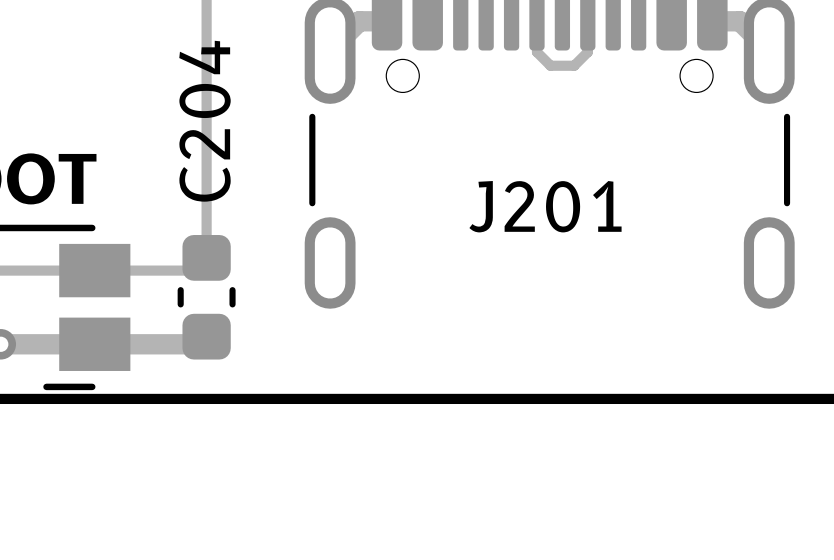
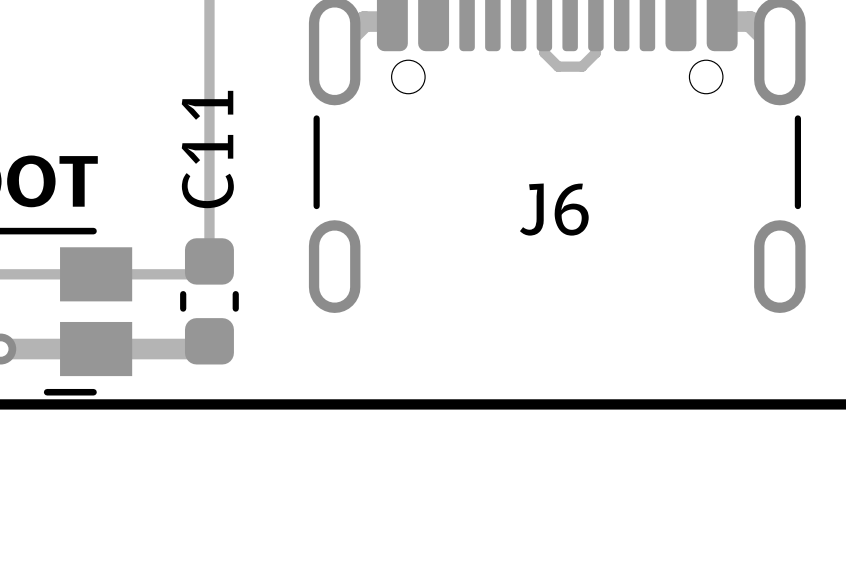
C204 name: C204 (204, 121) -> C11 (207, 149)
J201 name: J201 (545, 206) -> J6 (554, 209)

